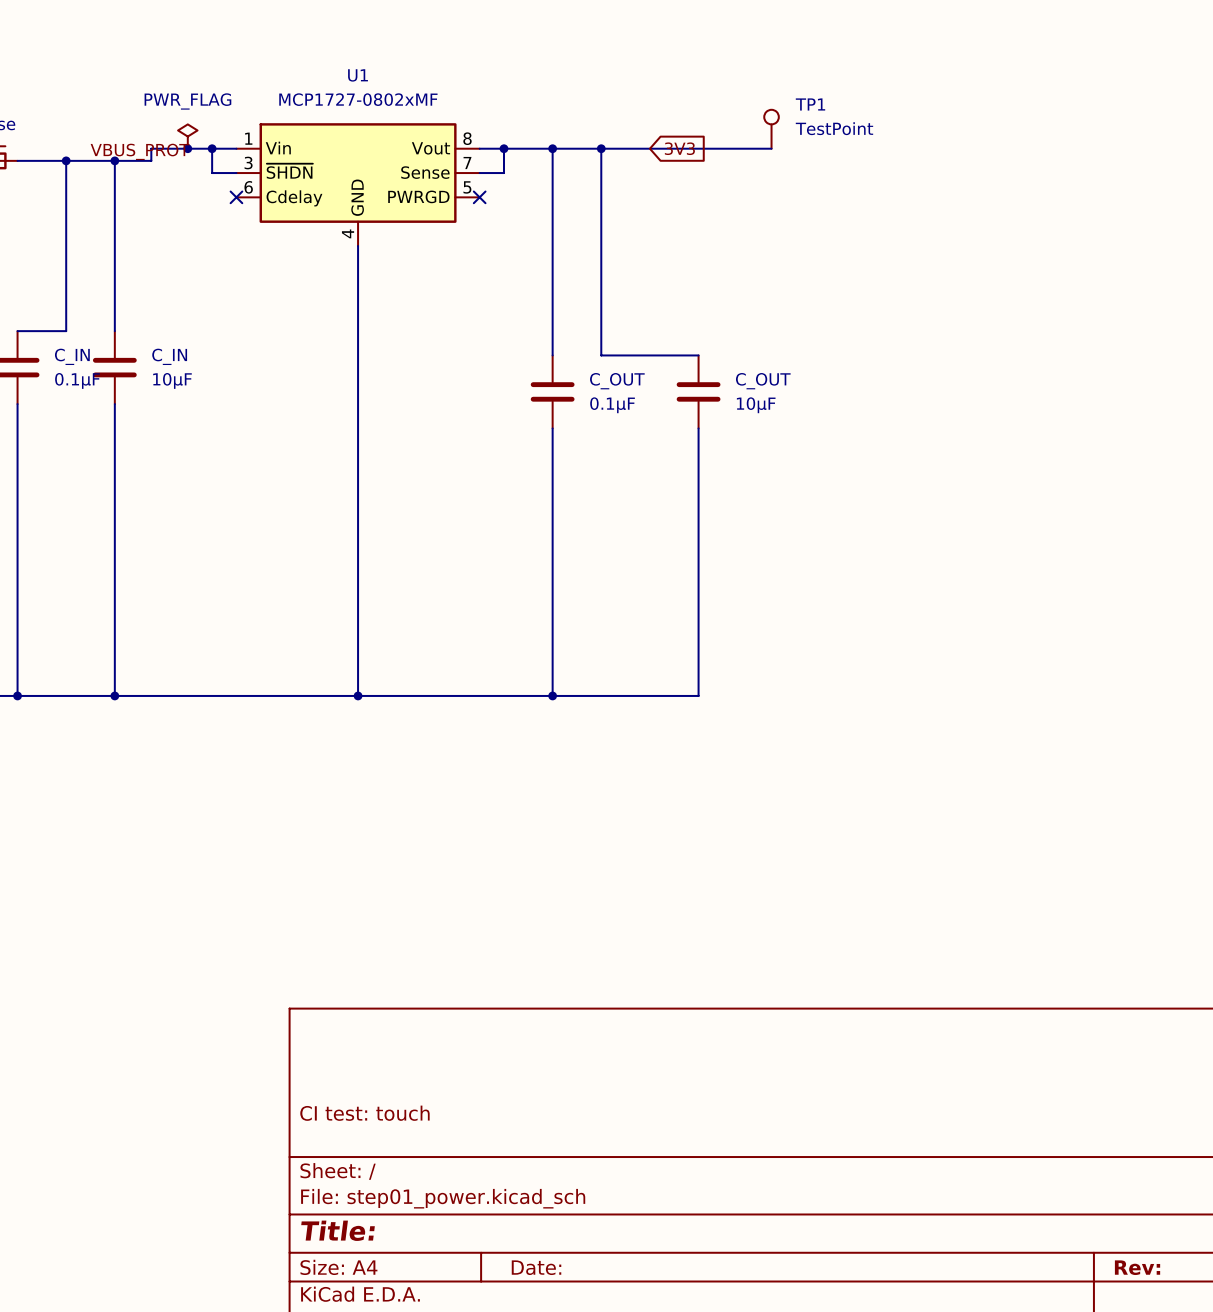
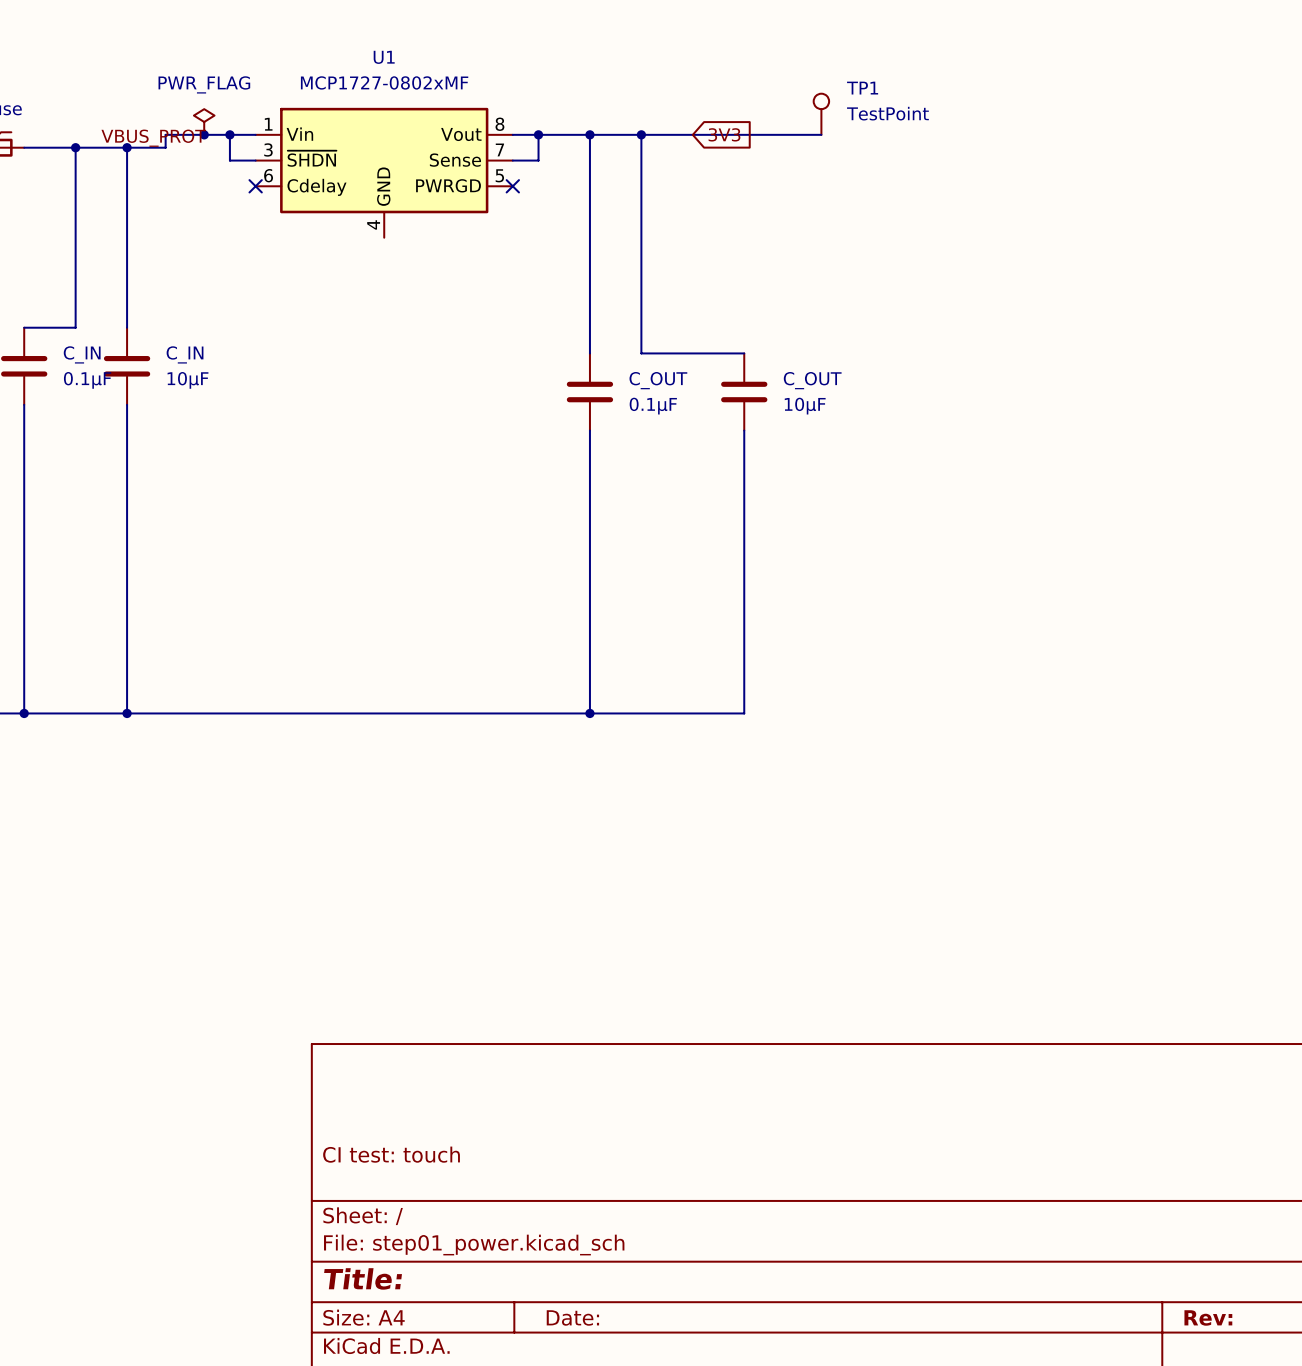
wire: (358, 246) (358, 695) -> none
junction: (358, 695) -> none

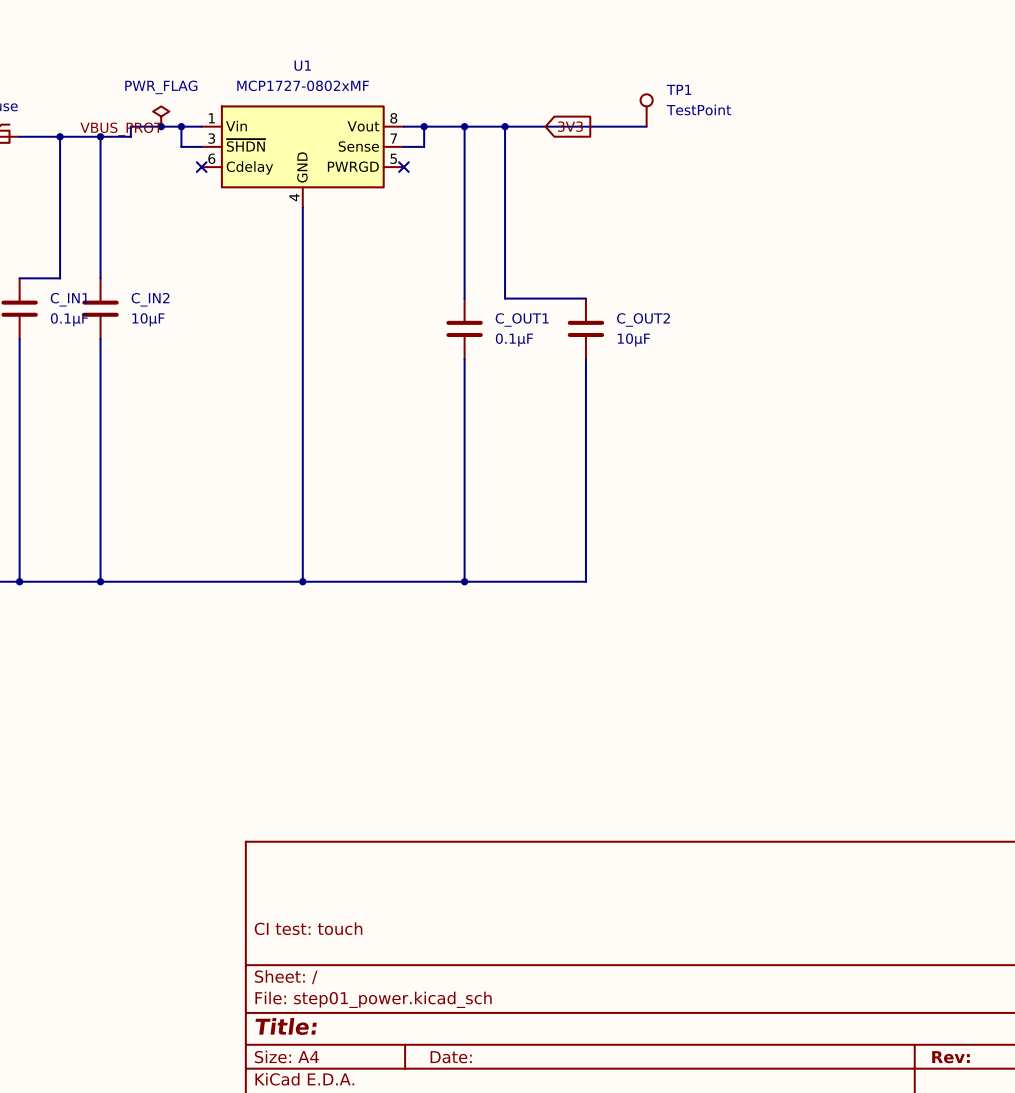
wire: none -> (302, 207) (302, 581)
C_IN name: C_IN (82, 354) -> C_IN1 (69, 299)
C_IN name: C_IN (185, 354) -> C_IN2 (150, 299)
C_OUT name: C_OUT (658, 380) -> C_OUT1 (522, 319)
C_OUT name: C_OUT (812, 380) -> C_OUT2 (643, 319)
junction: none -> (302, 581)

